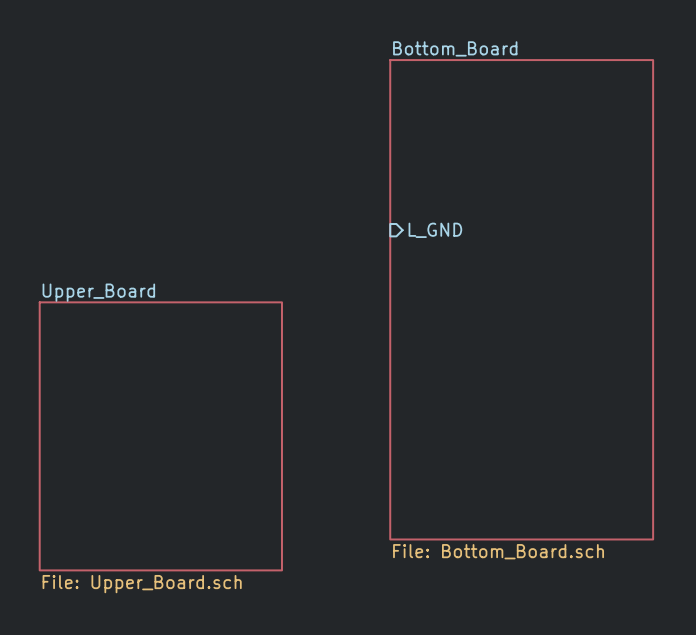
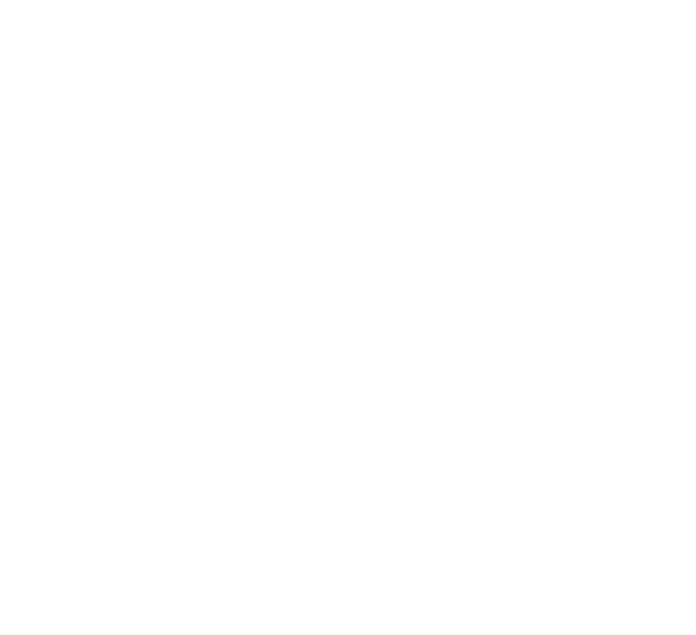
sheet pin: L_GND (435, 230) -> none
sheet Bottom_Board: File: Bottom_Board.sch (521, 299) -> none
sheet Upper_Board: File: Upper_Board.sch (160, 436) -> none

